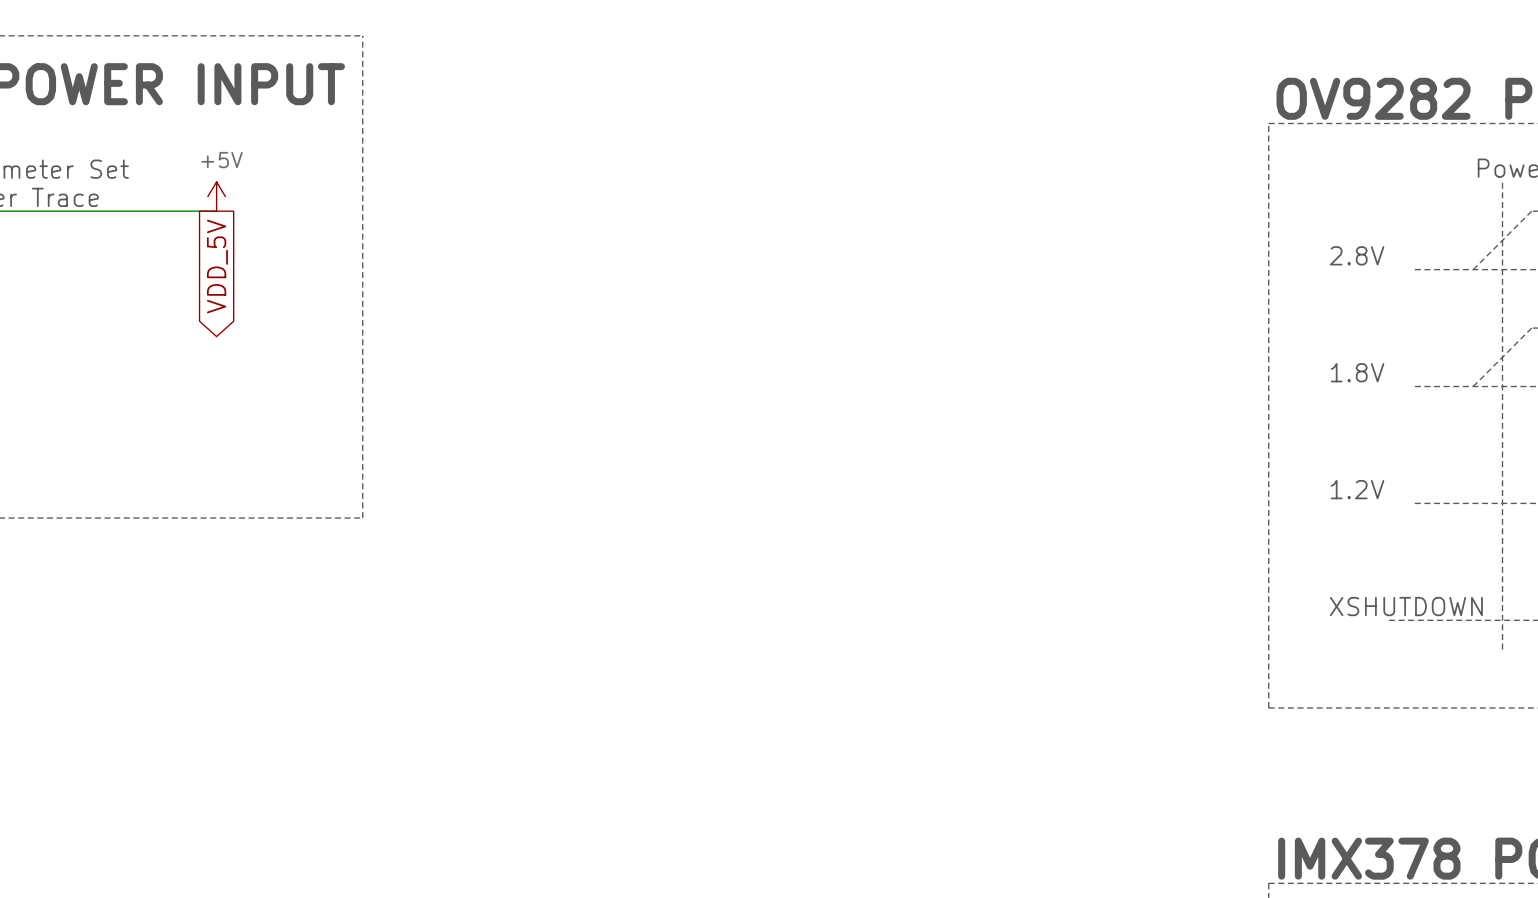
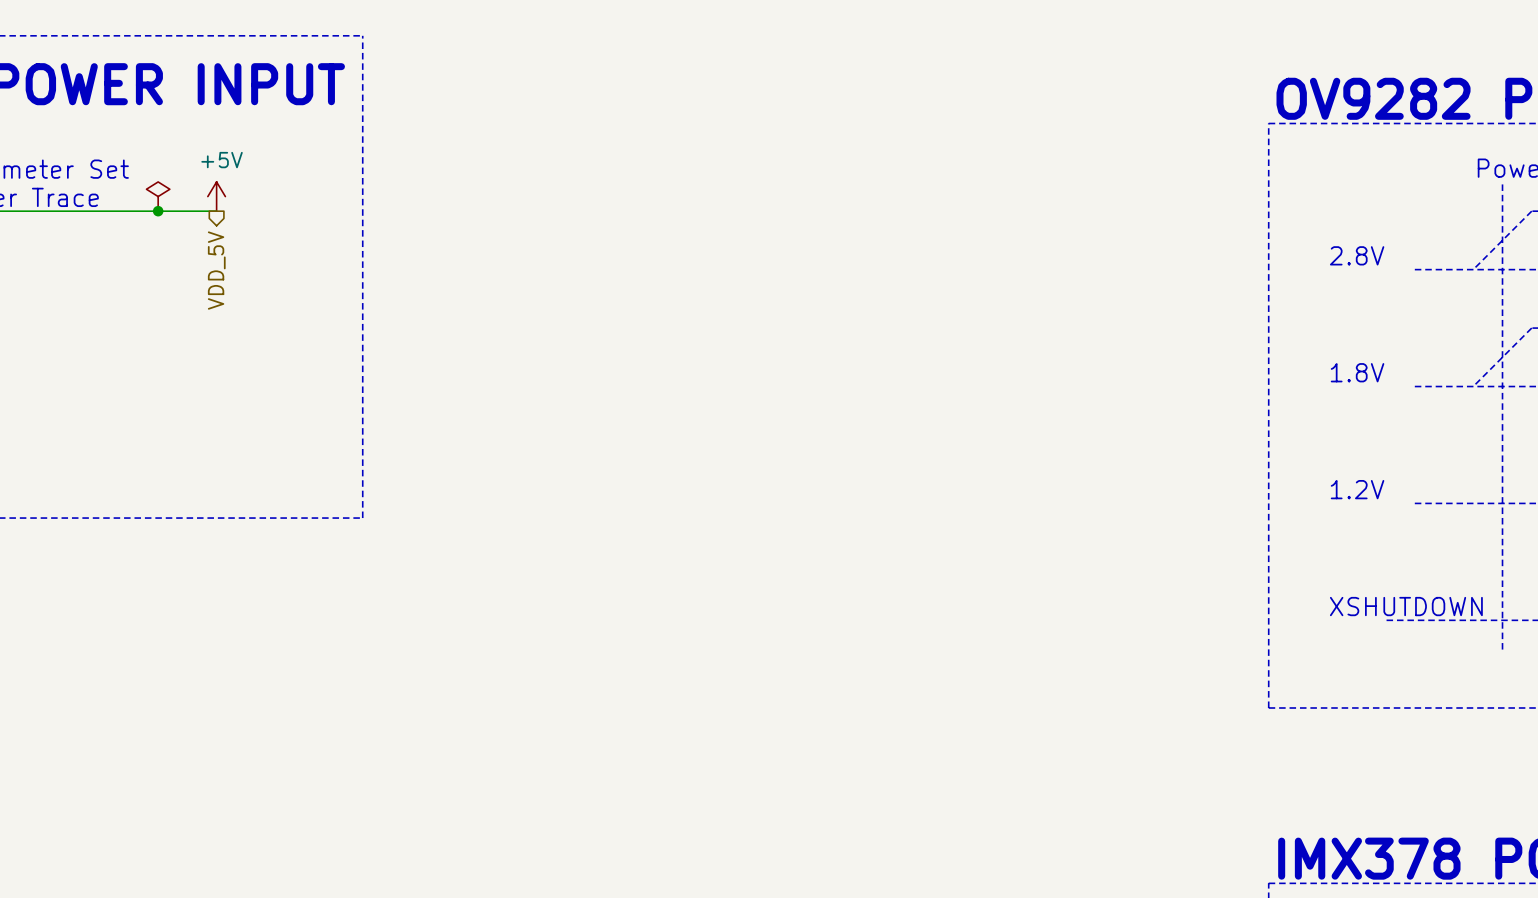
power symbol: none -> (158, 196)
junction: none -> (158, 211)
global label: VDD_5V (217, 266) -> none
hierarchical label: none -> VDD_5V (216, 270)

